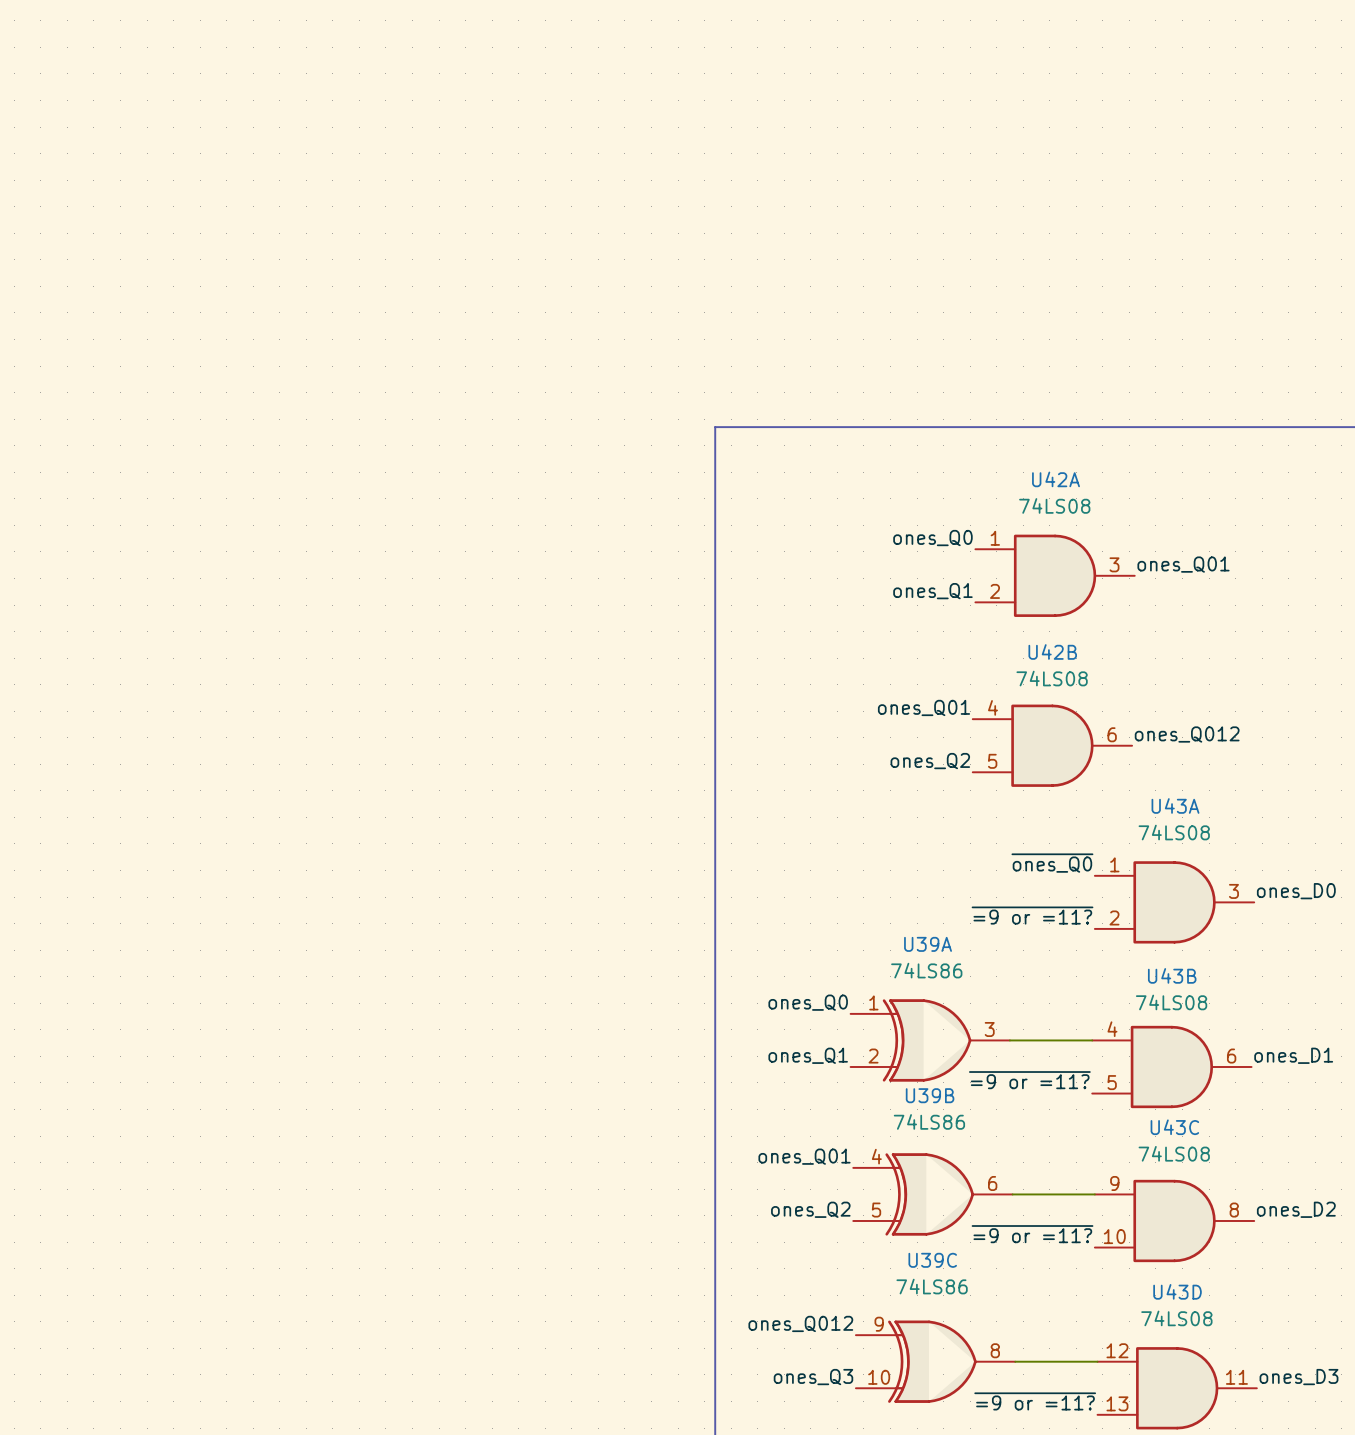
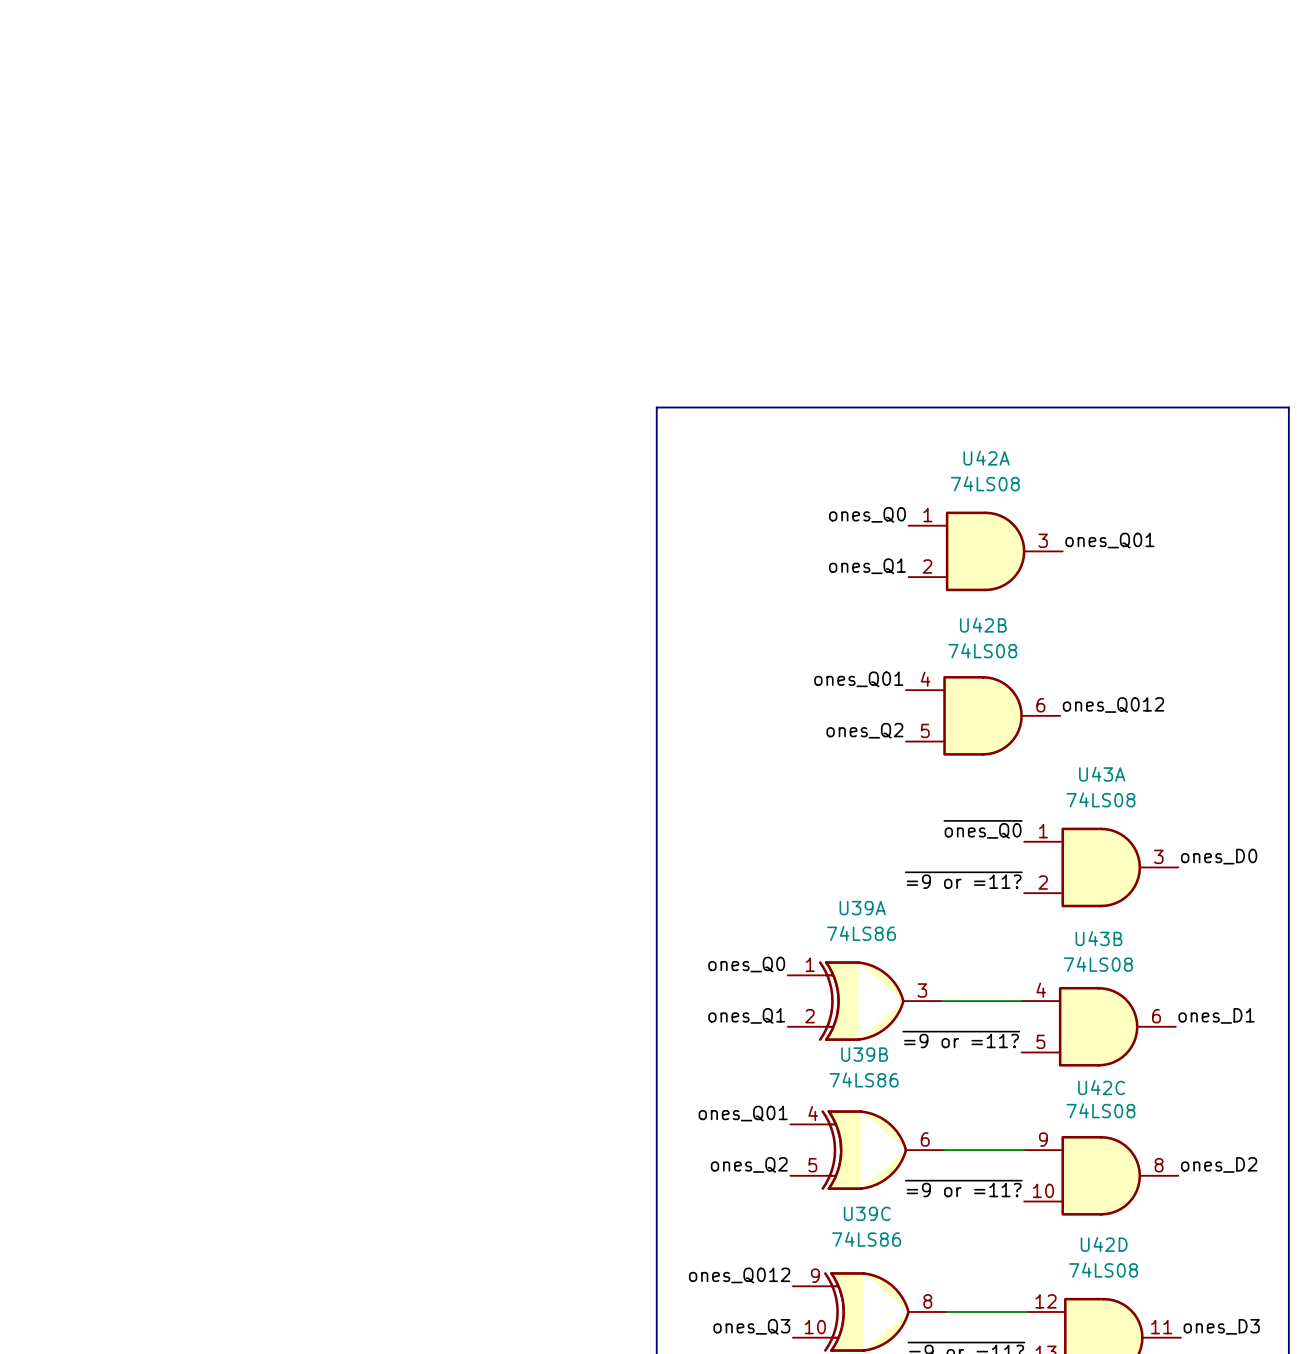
U43C name: U43C (1174, 1127) -> U42C (1101, 1087)
U43D name: U43D (1177, 1291) -> U42D (1104, 1244)

